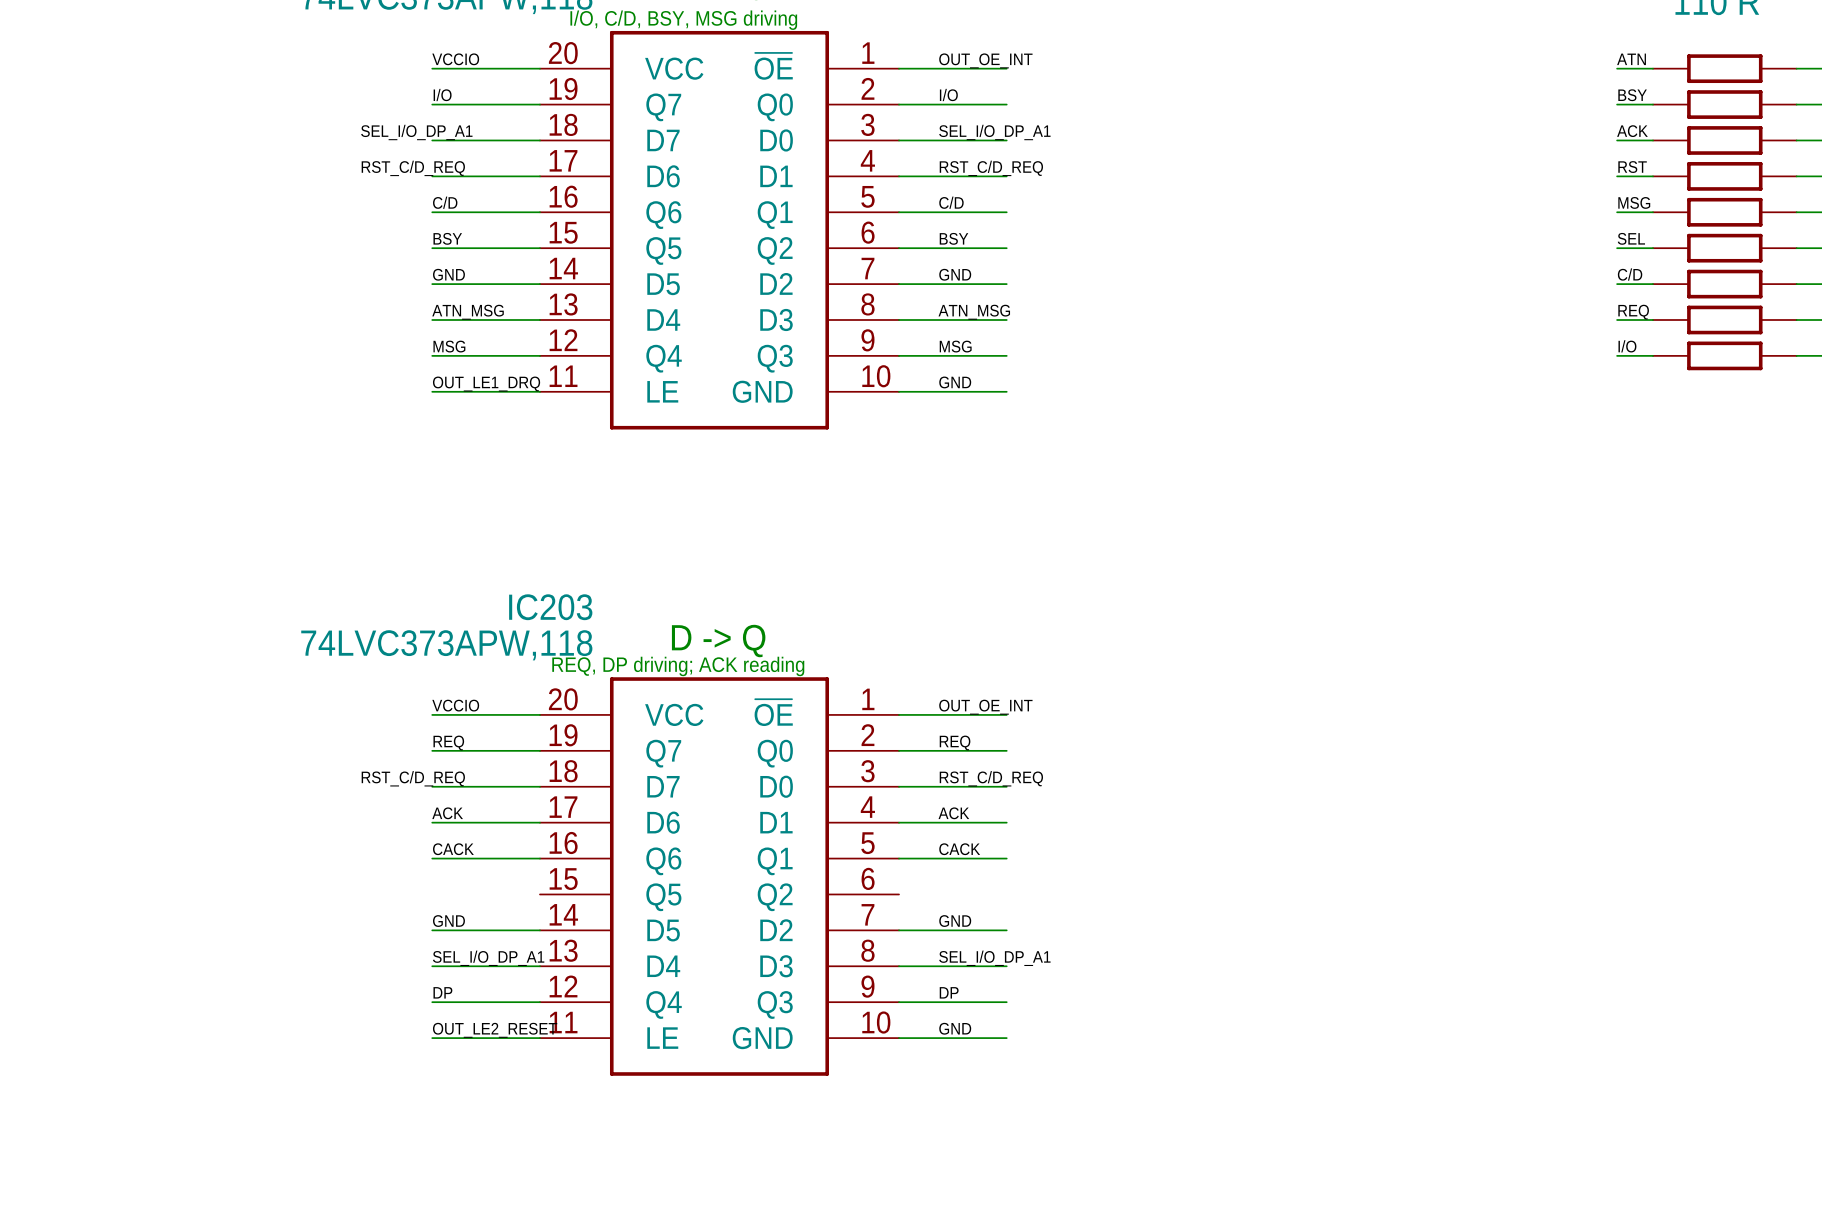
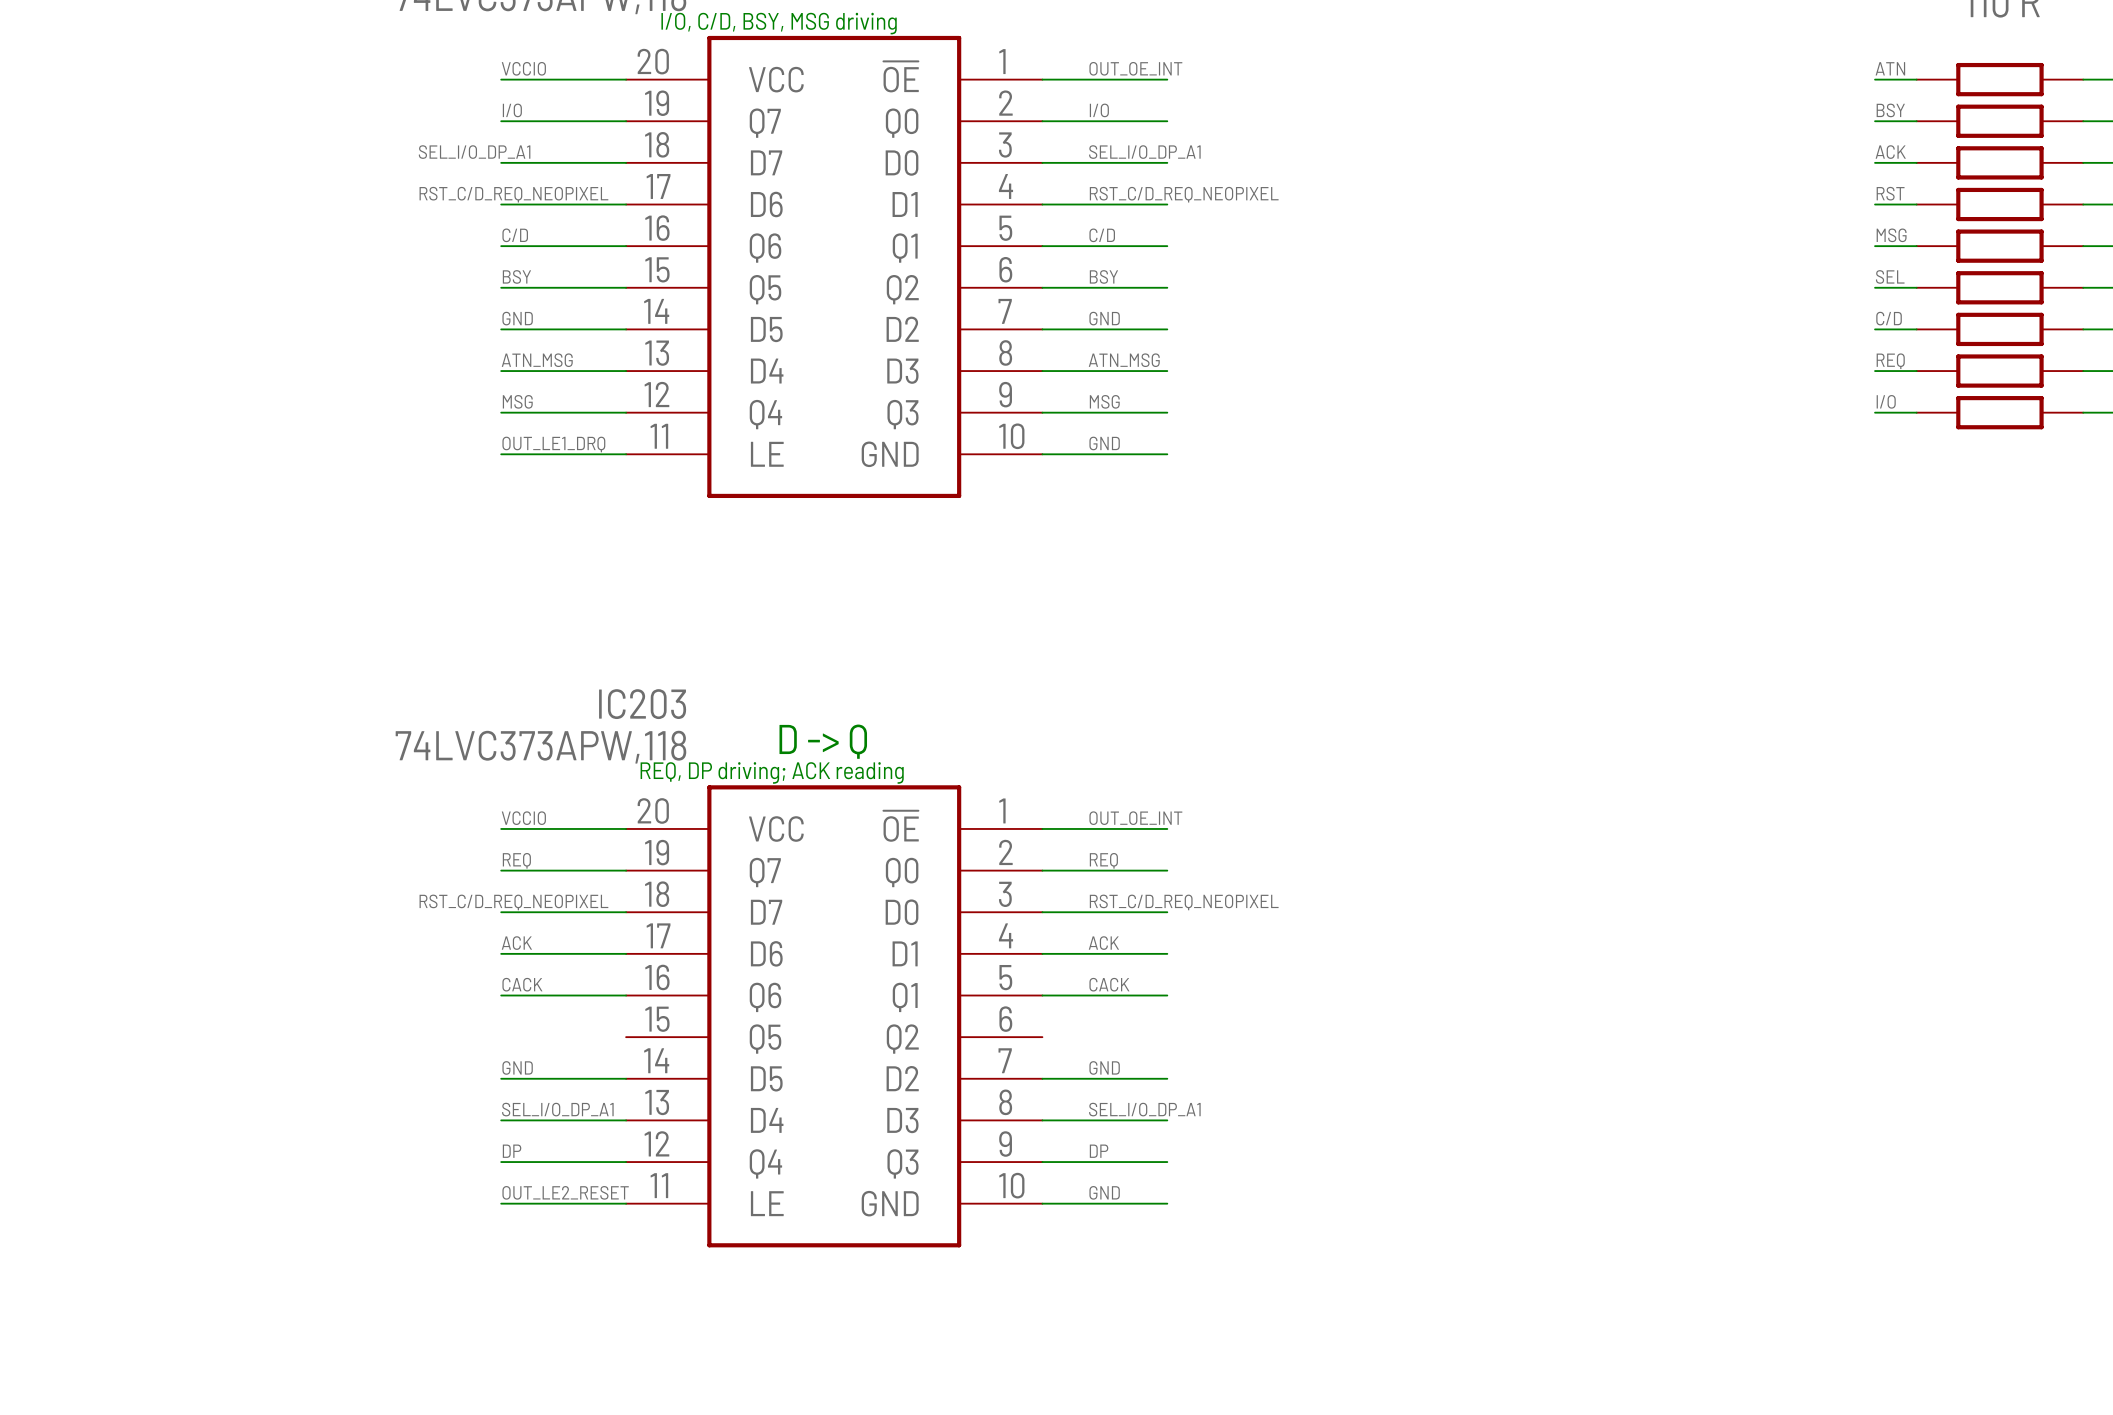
label: RST_C/D_REQ (413, 168) -> RST_C/D_REQ_NEOPIXEL (513, 194)
label: RST_C/D_REQ (991, 168) -> RST_C/D_REQ_NEOPIXEL (1184, 194)
label: RST_C/D_REQ (413, 778) -> RST_C/D_REQ_NEOPIXEL (513, 902)
label: RST_C/D_REQ (991, 778) -> RST_C/D_REQ_NEOPIXEL (1184, 902)

